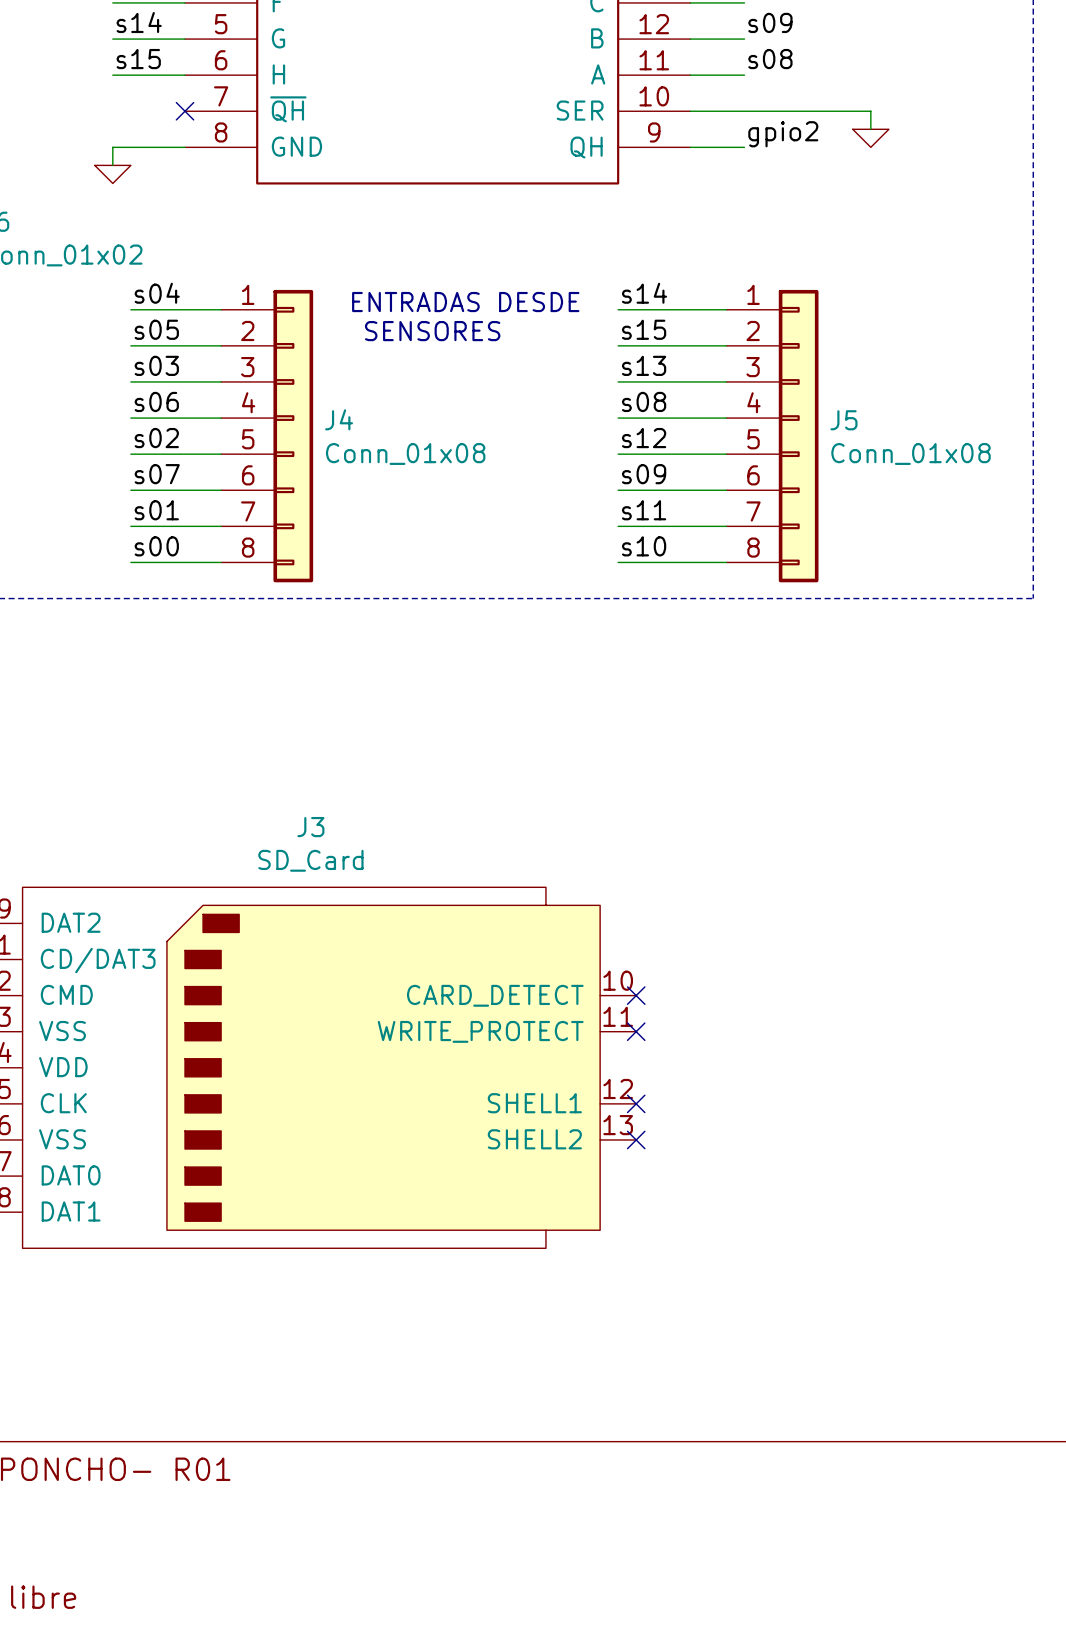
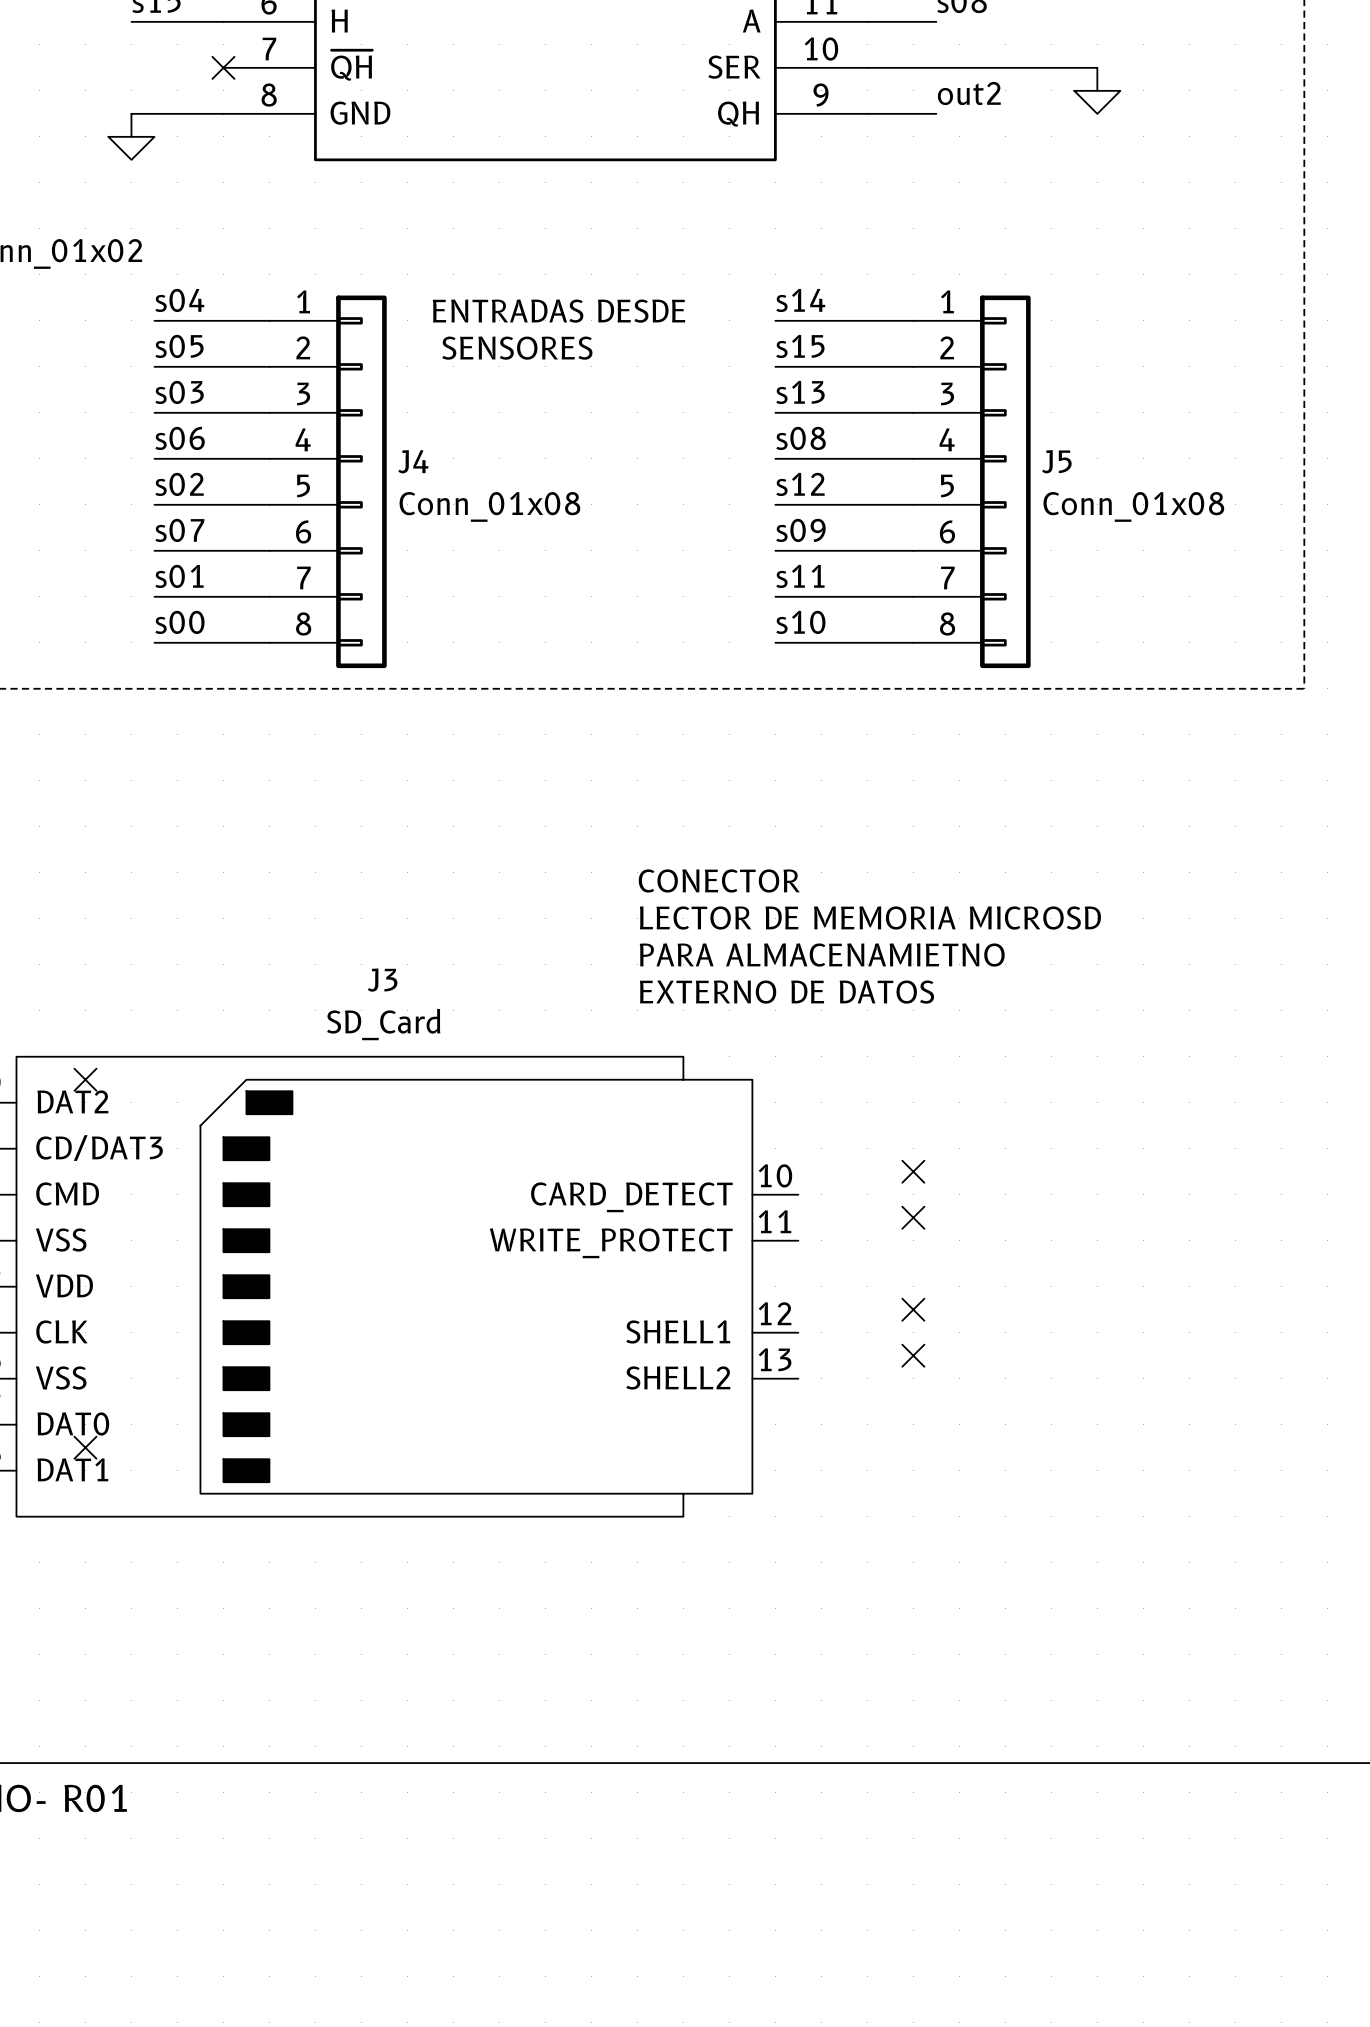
label: gpio2 (783, 134) -> out2 (969, 93)
text: none -> CONECTOR (719, 880)
text: none -> LECTOR DE MEMORIA MICROSD (870, 917)
text: none -> PARA ALMACENAMIETNO (822, 955)
text: none -> EXTERNO DE DATOS (786, 992)
no-connect mark: none -> (85, 1079)
no-connect mark: none -> (913, 1171)
no-connect mark: (636, 995) -> none
no-connect mark: none -> (913, 1217)
no-connect mark: (636, 1031) -> none
no-connect mark: none -> (913, 1309)
no-connect mark: (636, 1103) -> none
no-connect mark: none -> (913, 1355)
no-connect mark: (636, 1139) -> none
no-connect mark: none -> (85, 1447)

